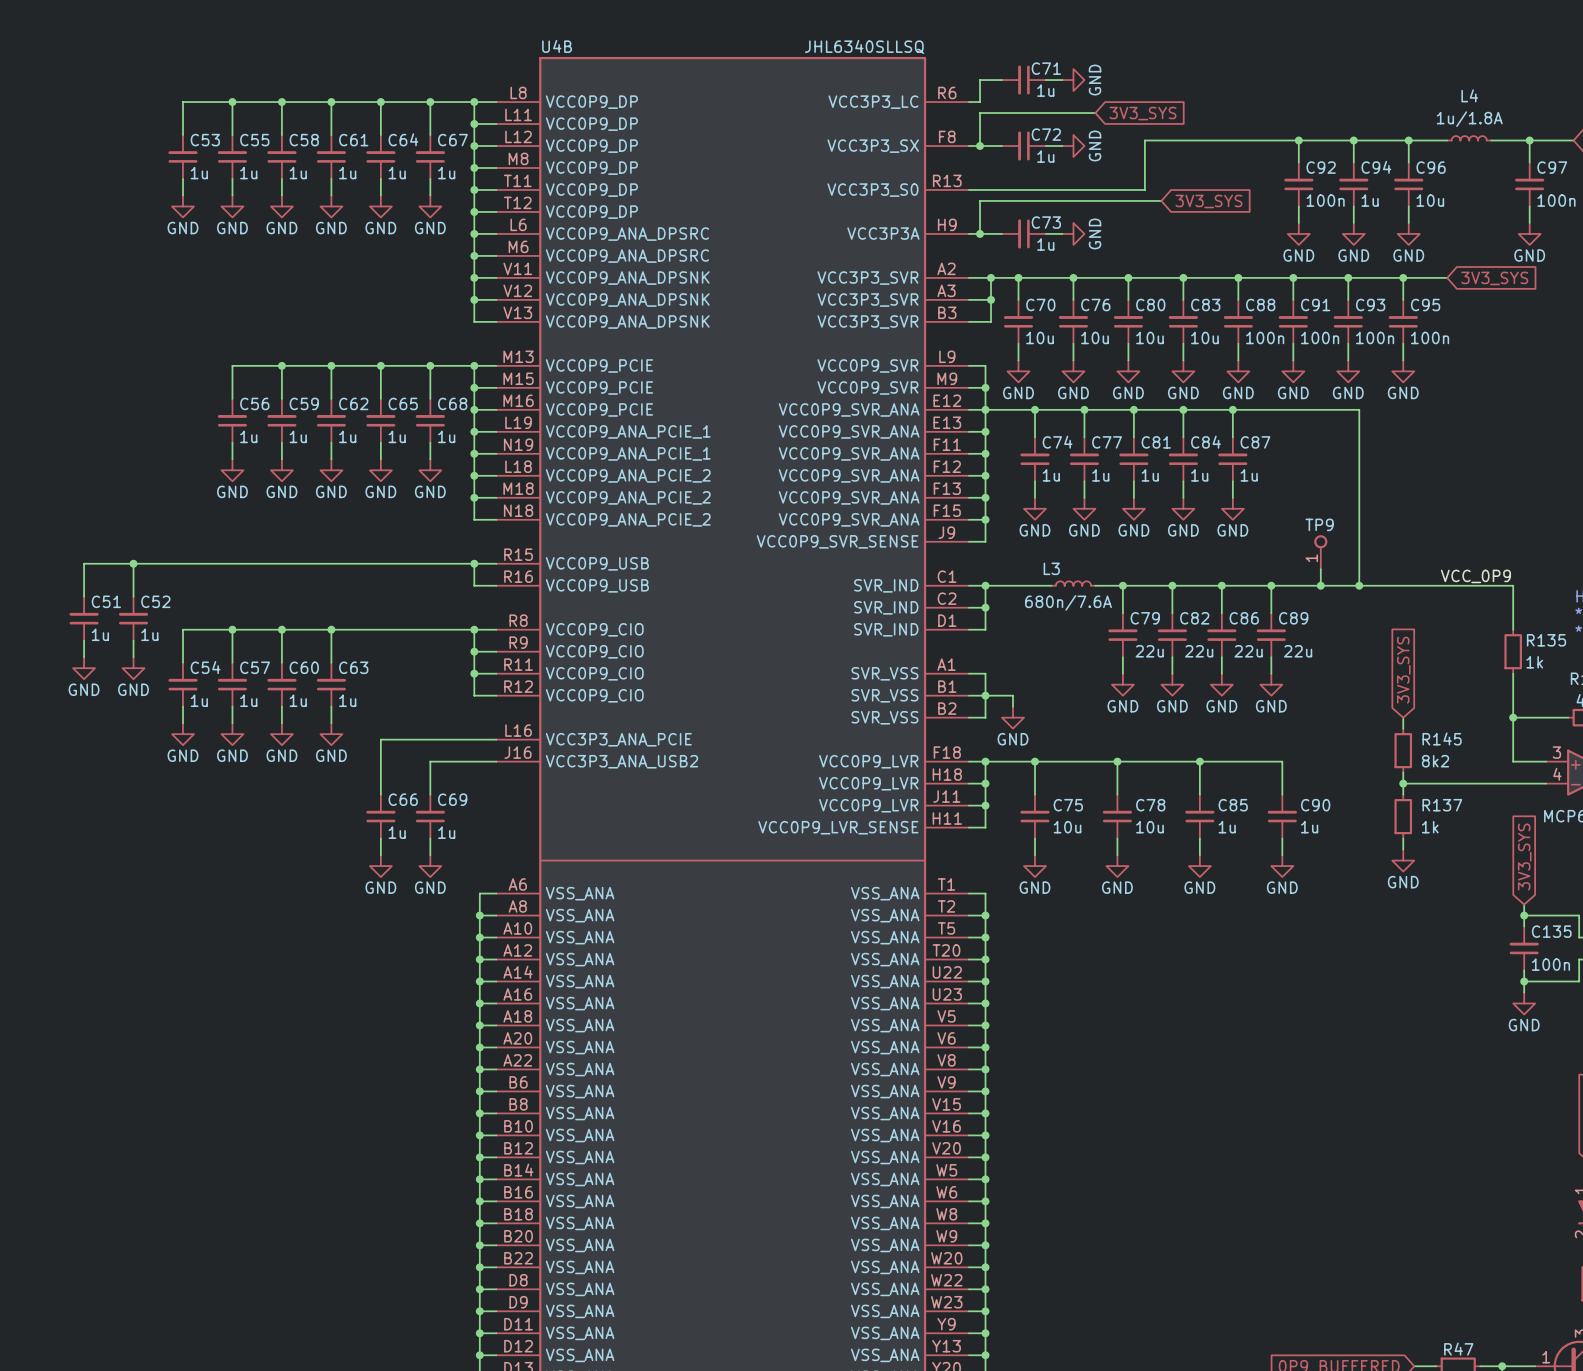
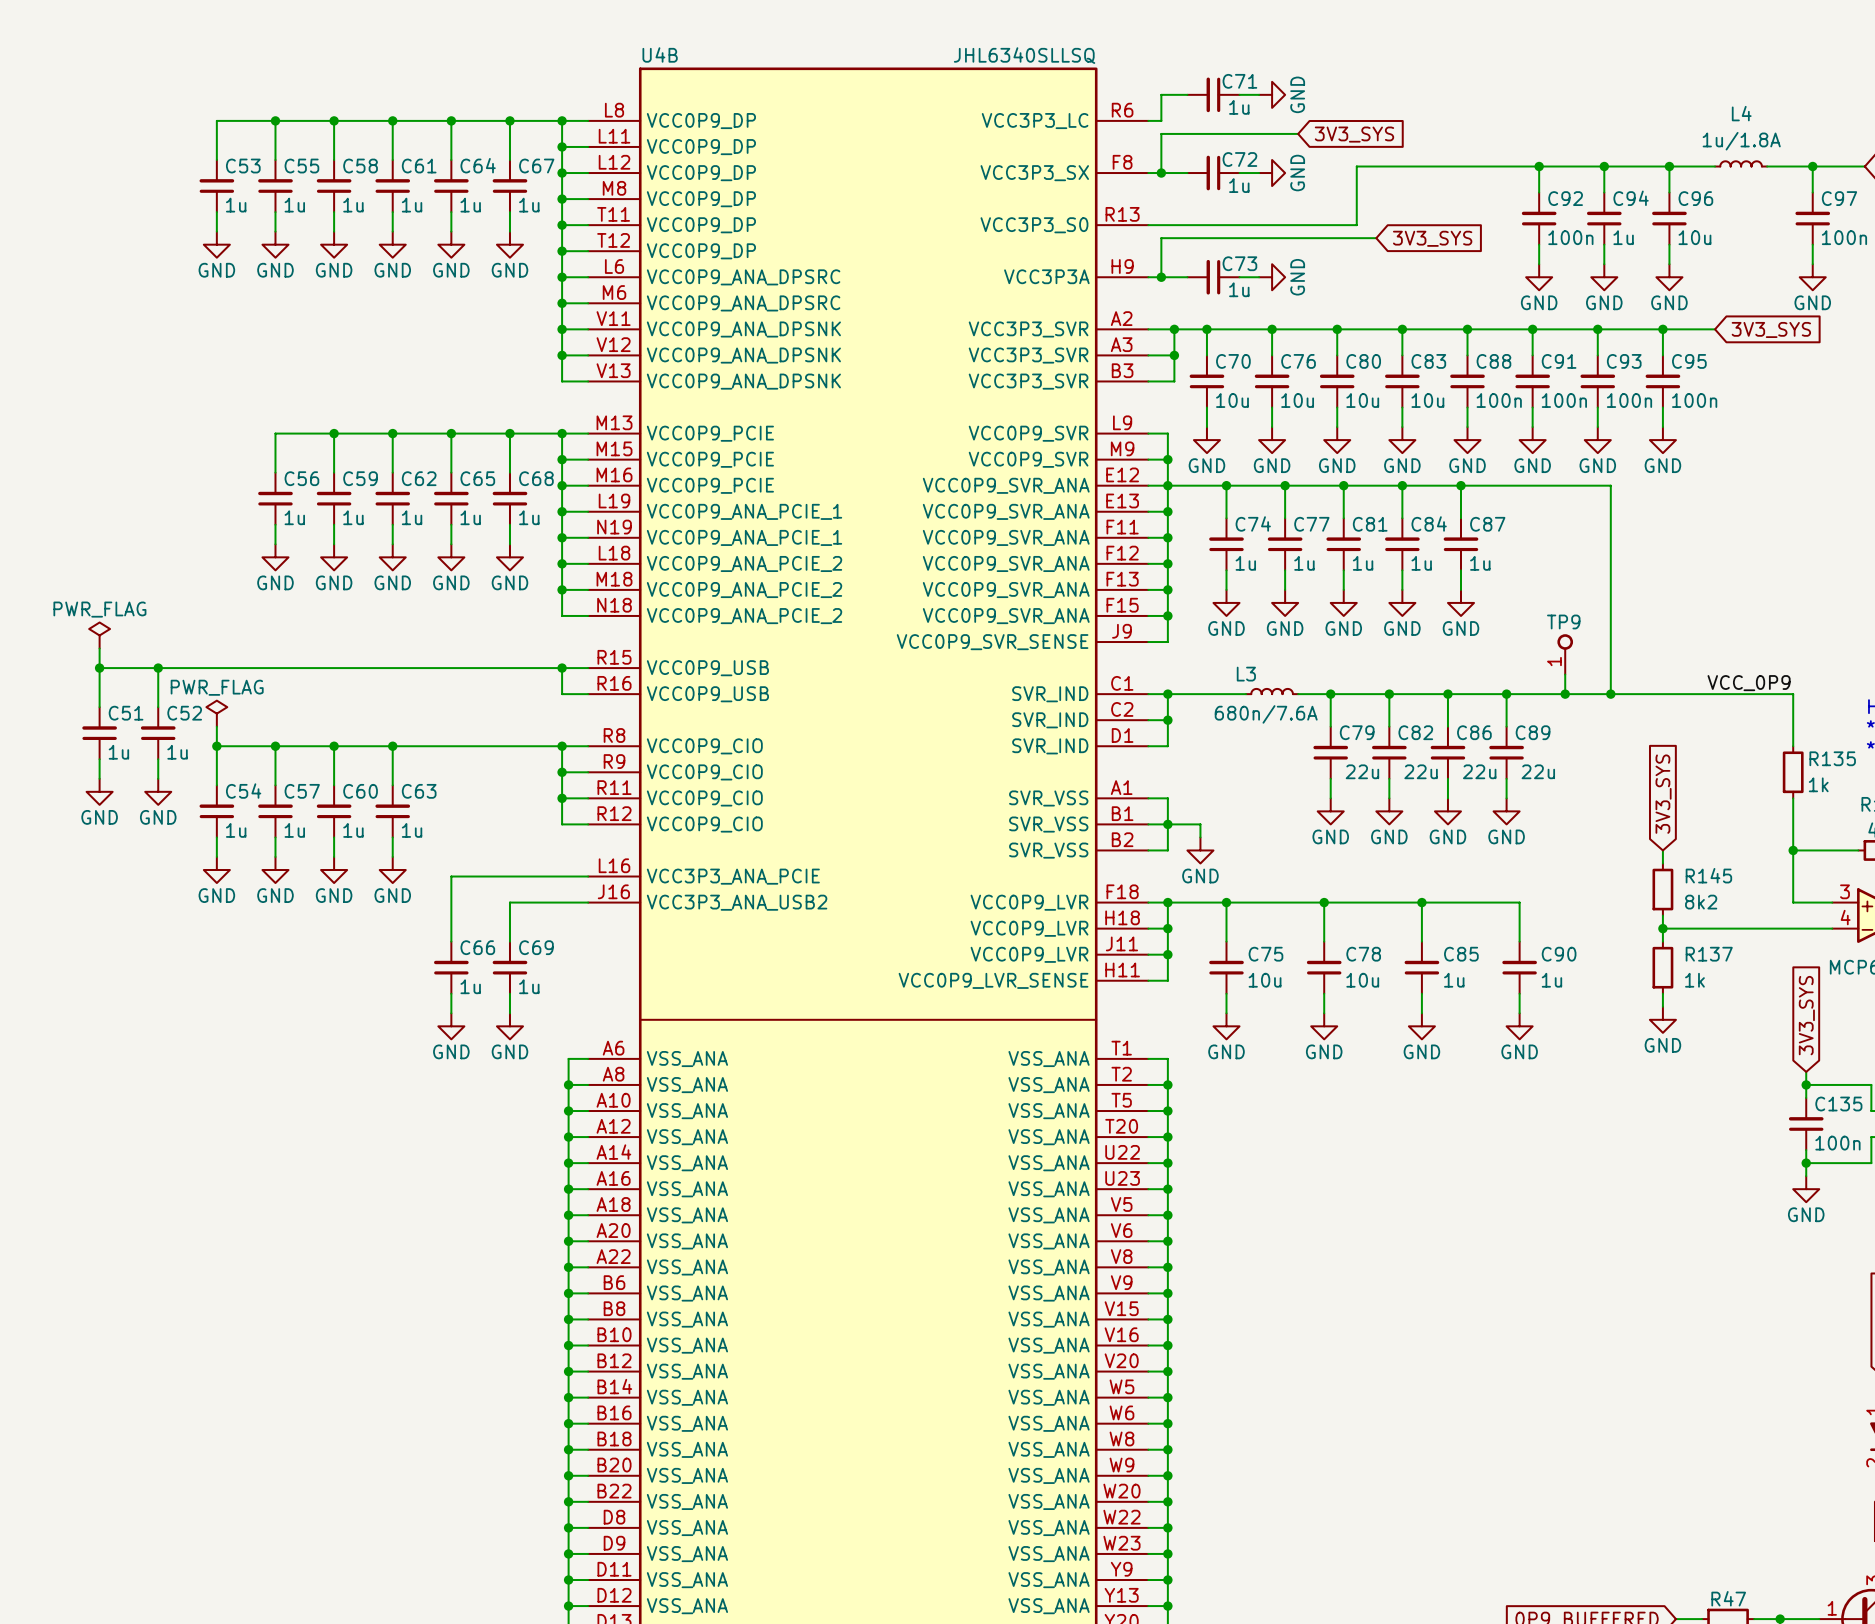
power symbol: none -> PWR_FLAG (99, 635)
wire: none -> (99, 648) (99, 668)
junction: none -> (99, 668)
power symbol: none -> PWR_FLAG (216, 713)
wire: none -> (216, 726) (216, 746)
junction: none -> (216, 746)

